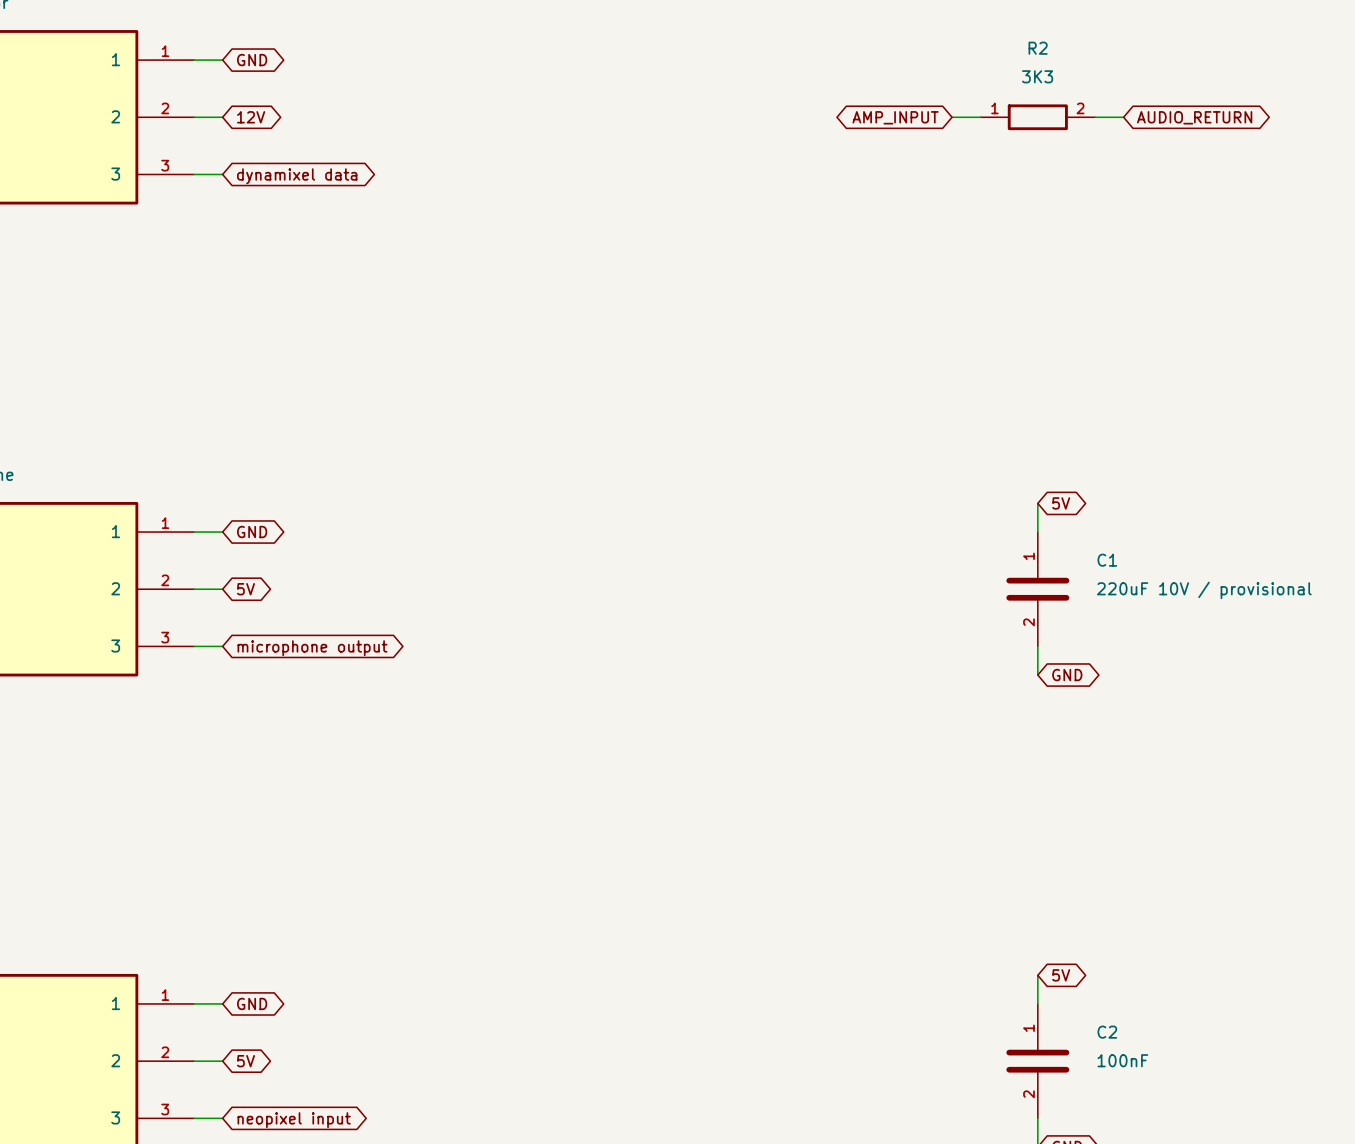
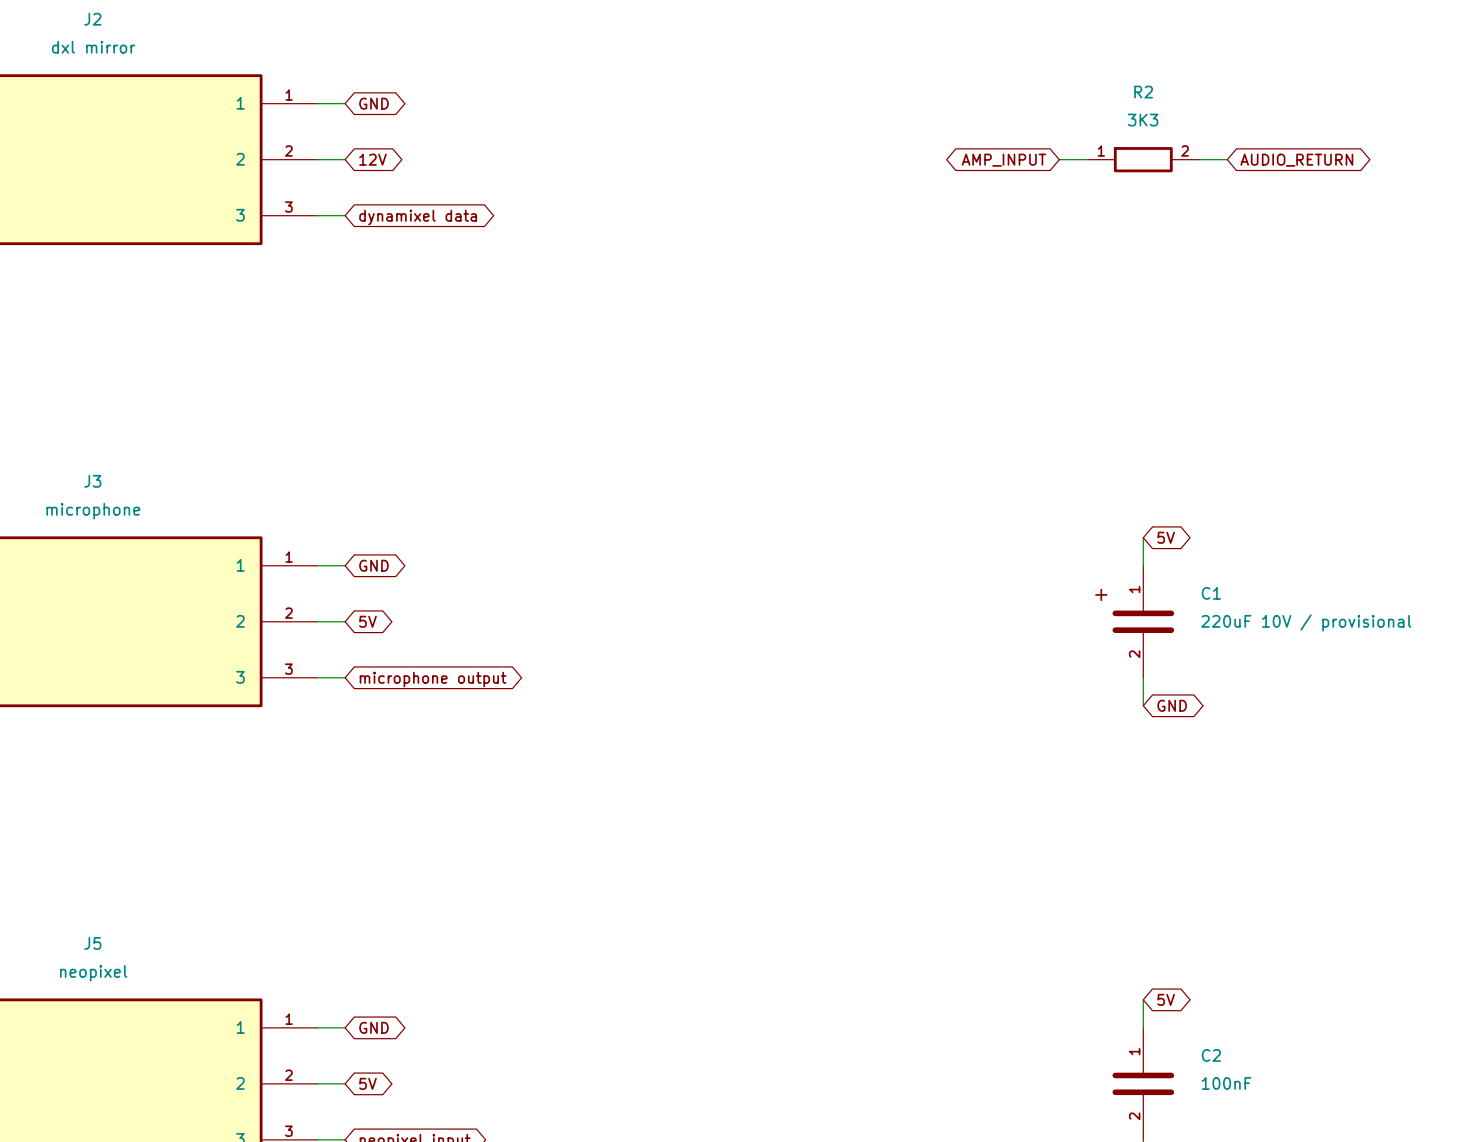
C1 text: none -> + (1101, 594)

